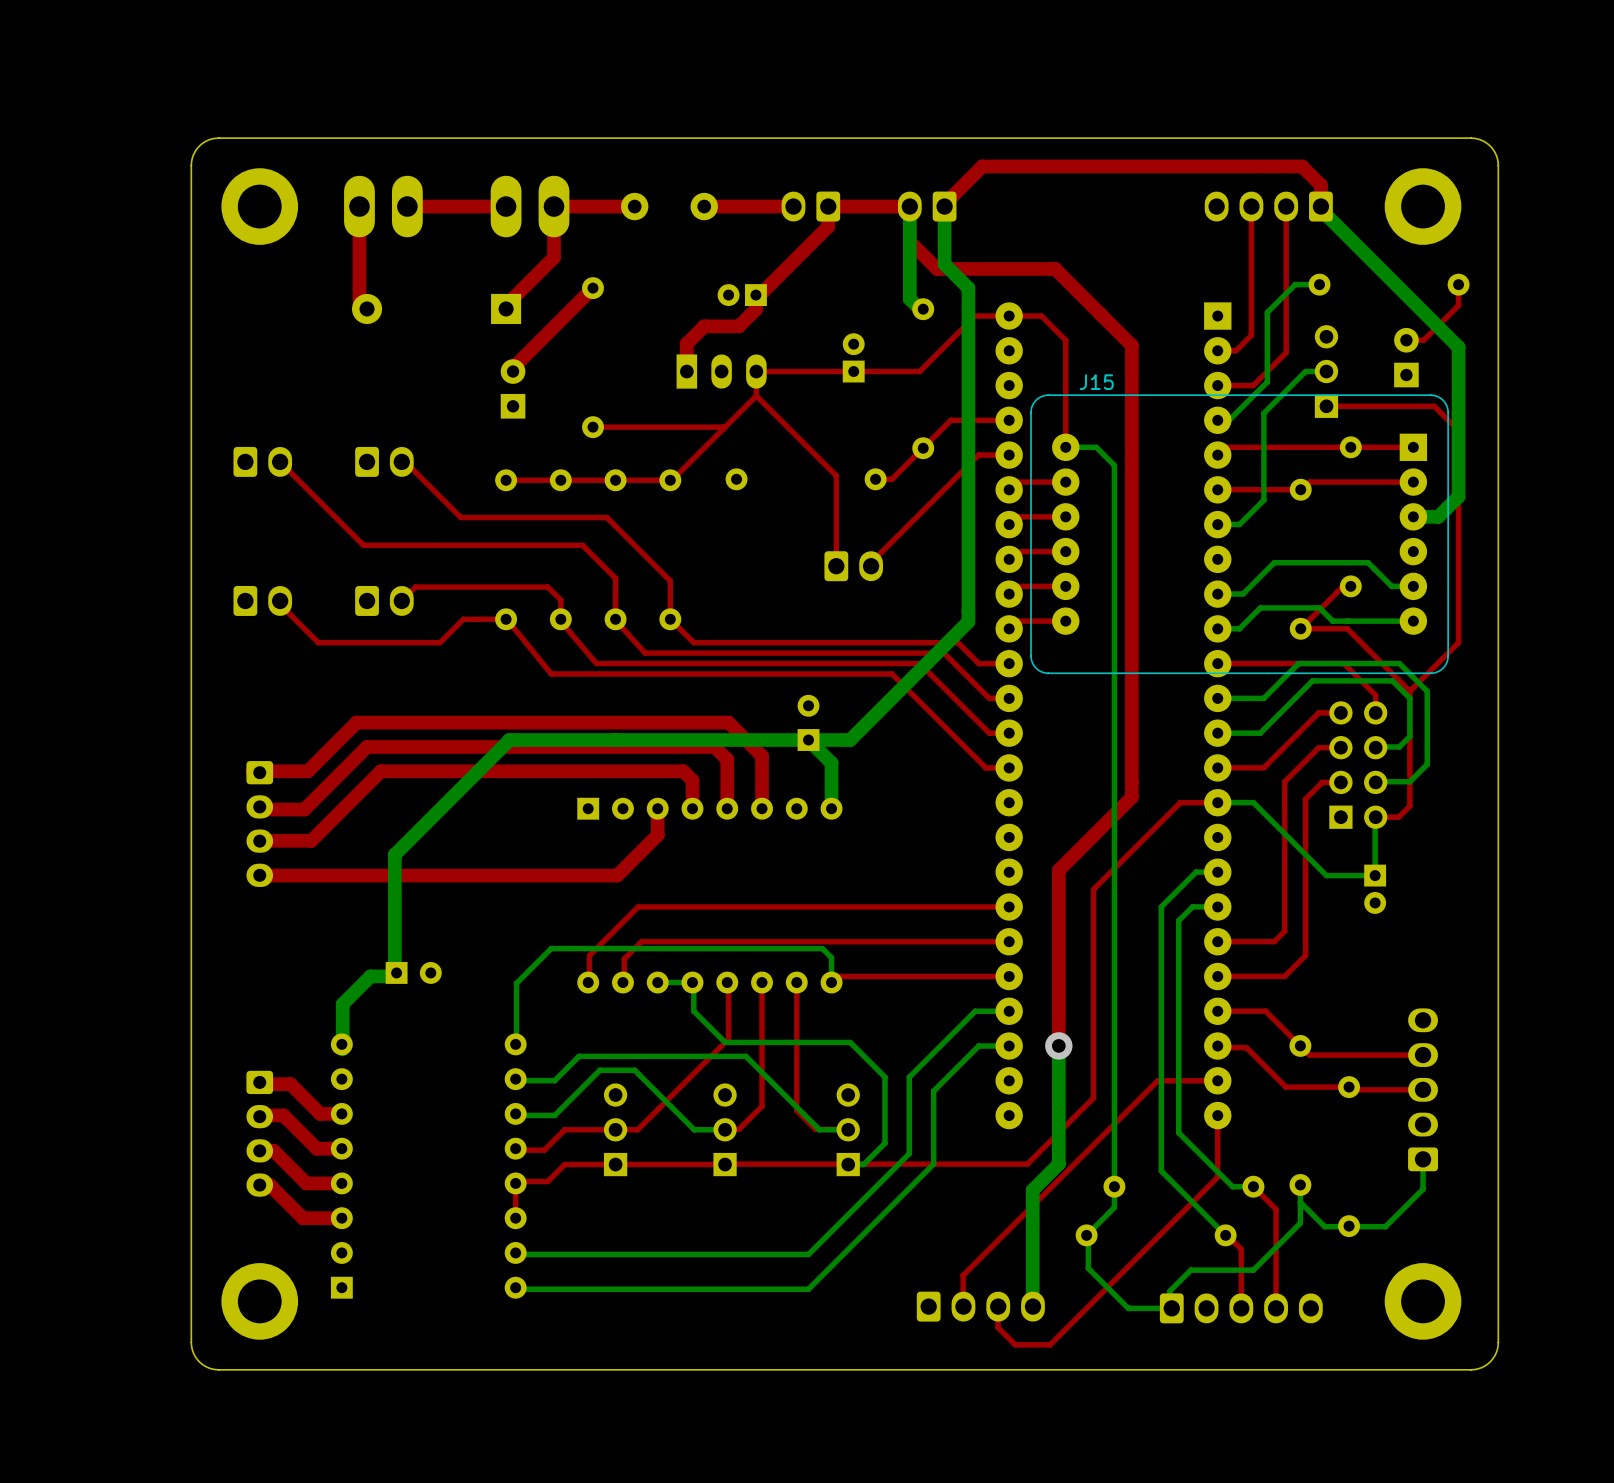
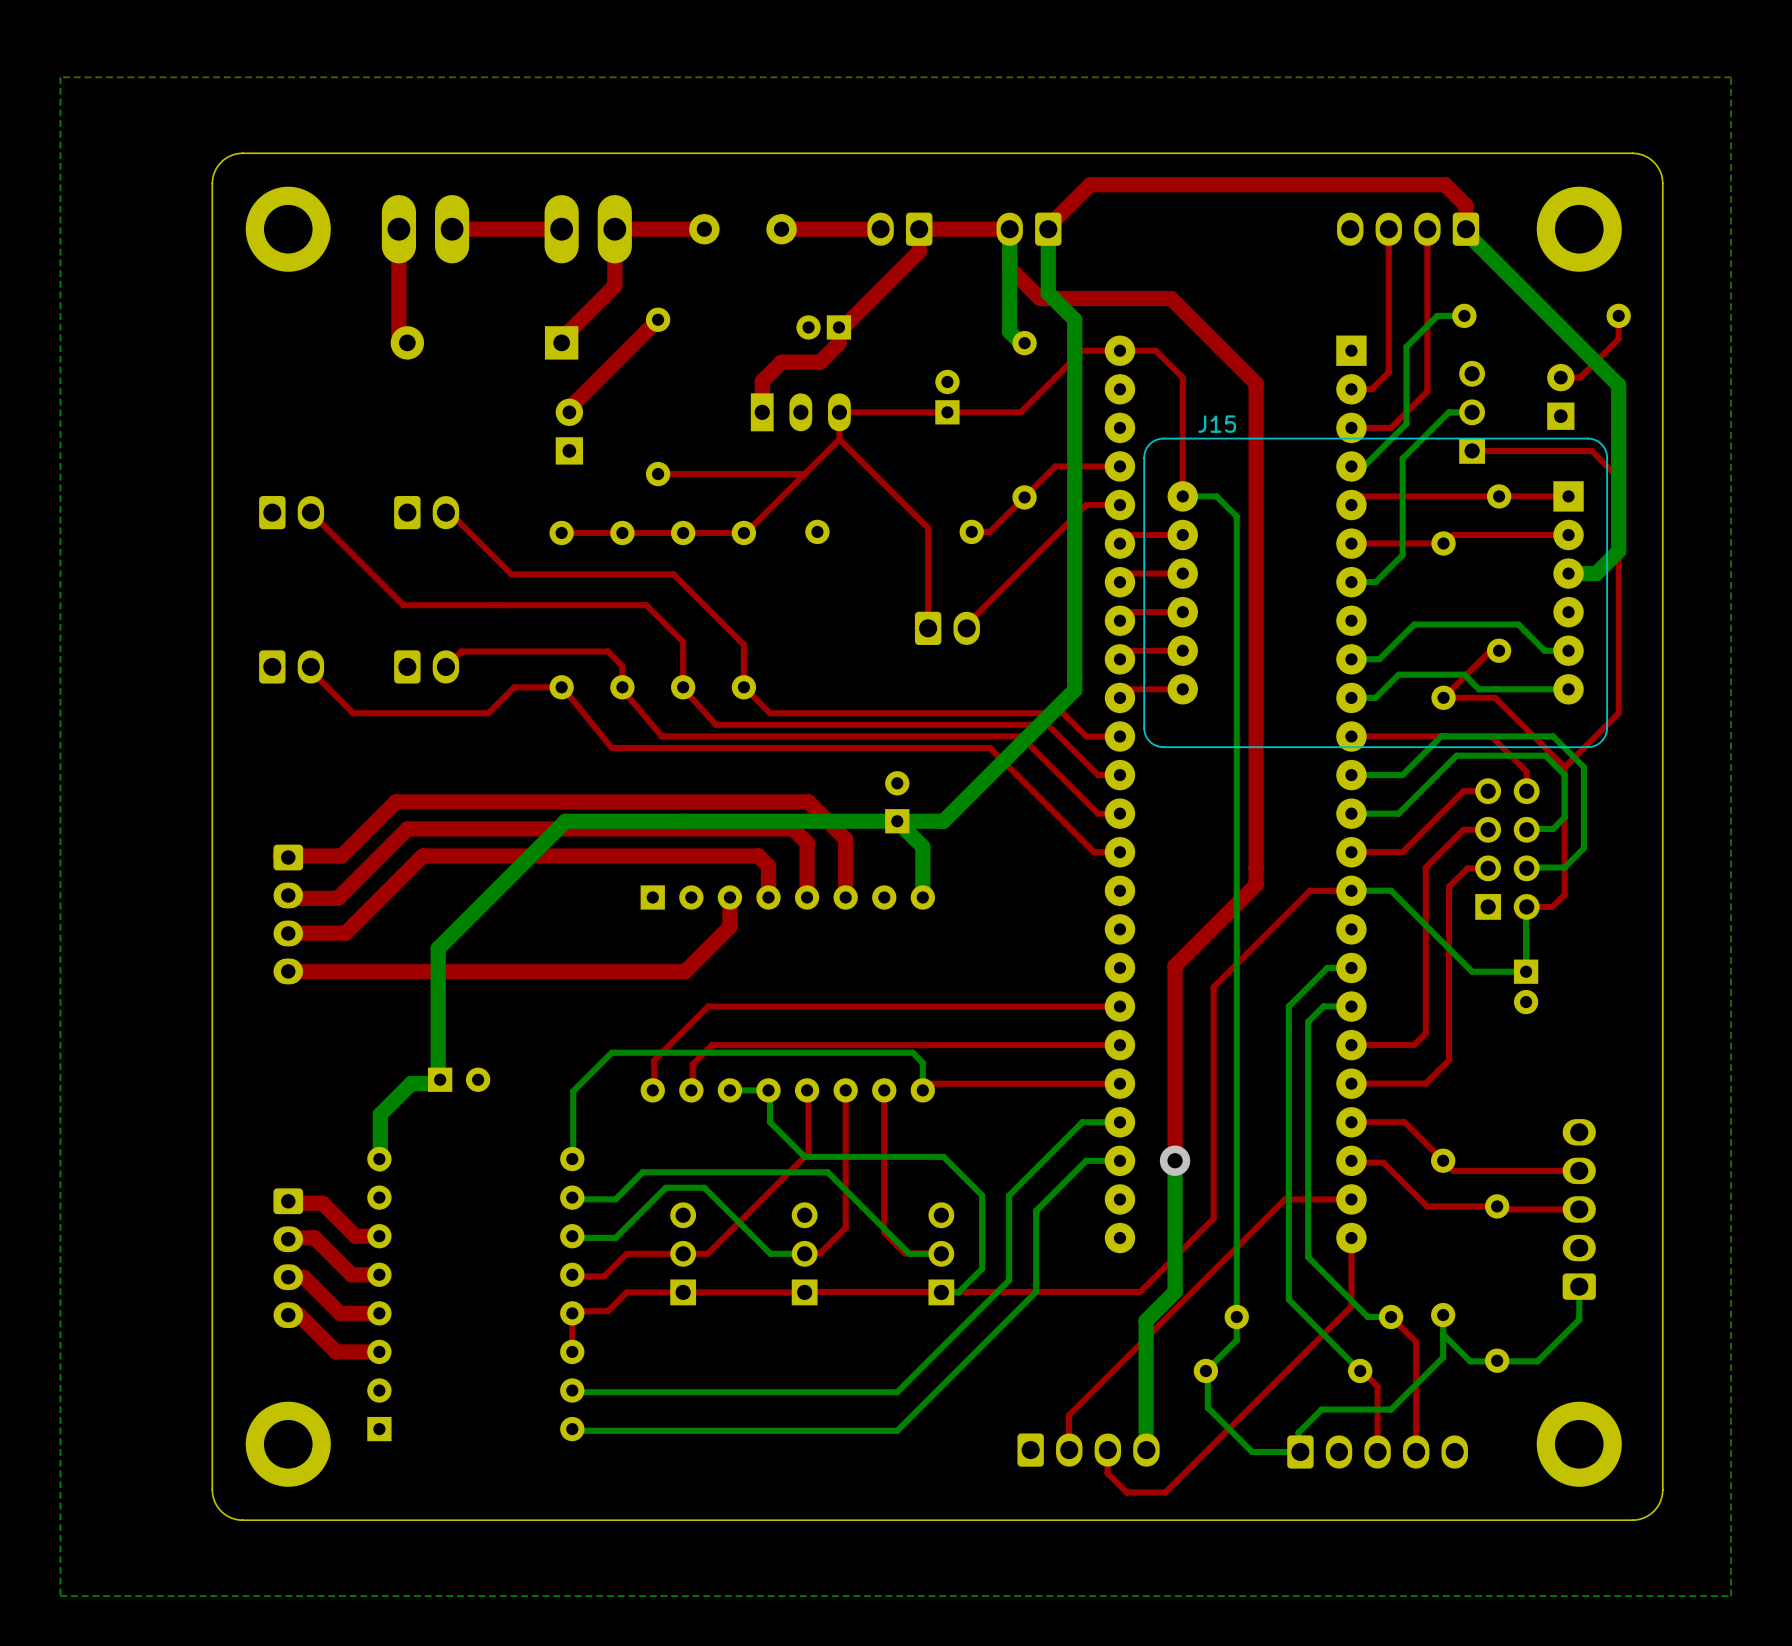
bottom zone outline: none -> (1731, 77) (1731, 1596) (60, 1596) (60, 77) (1731, 77)

